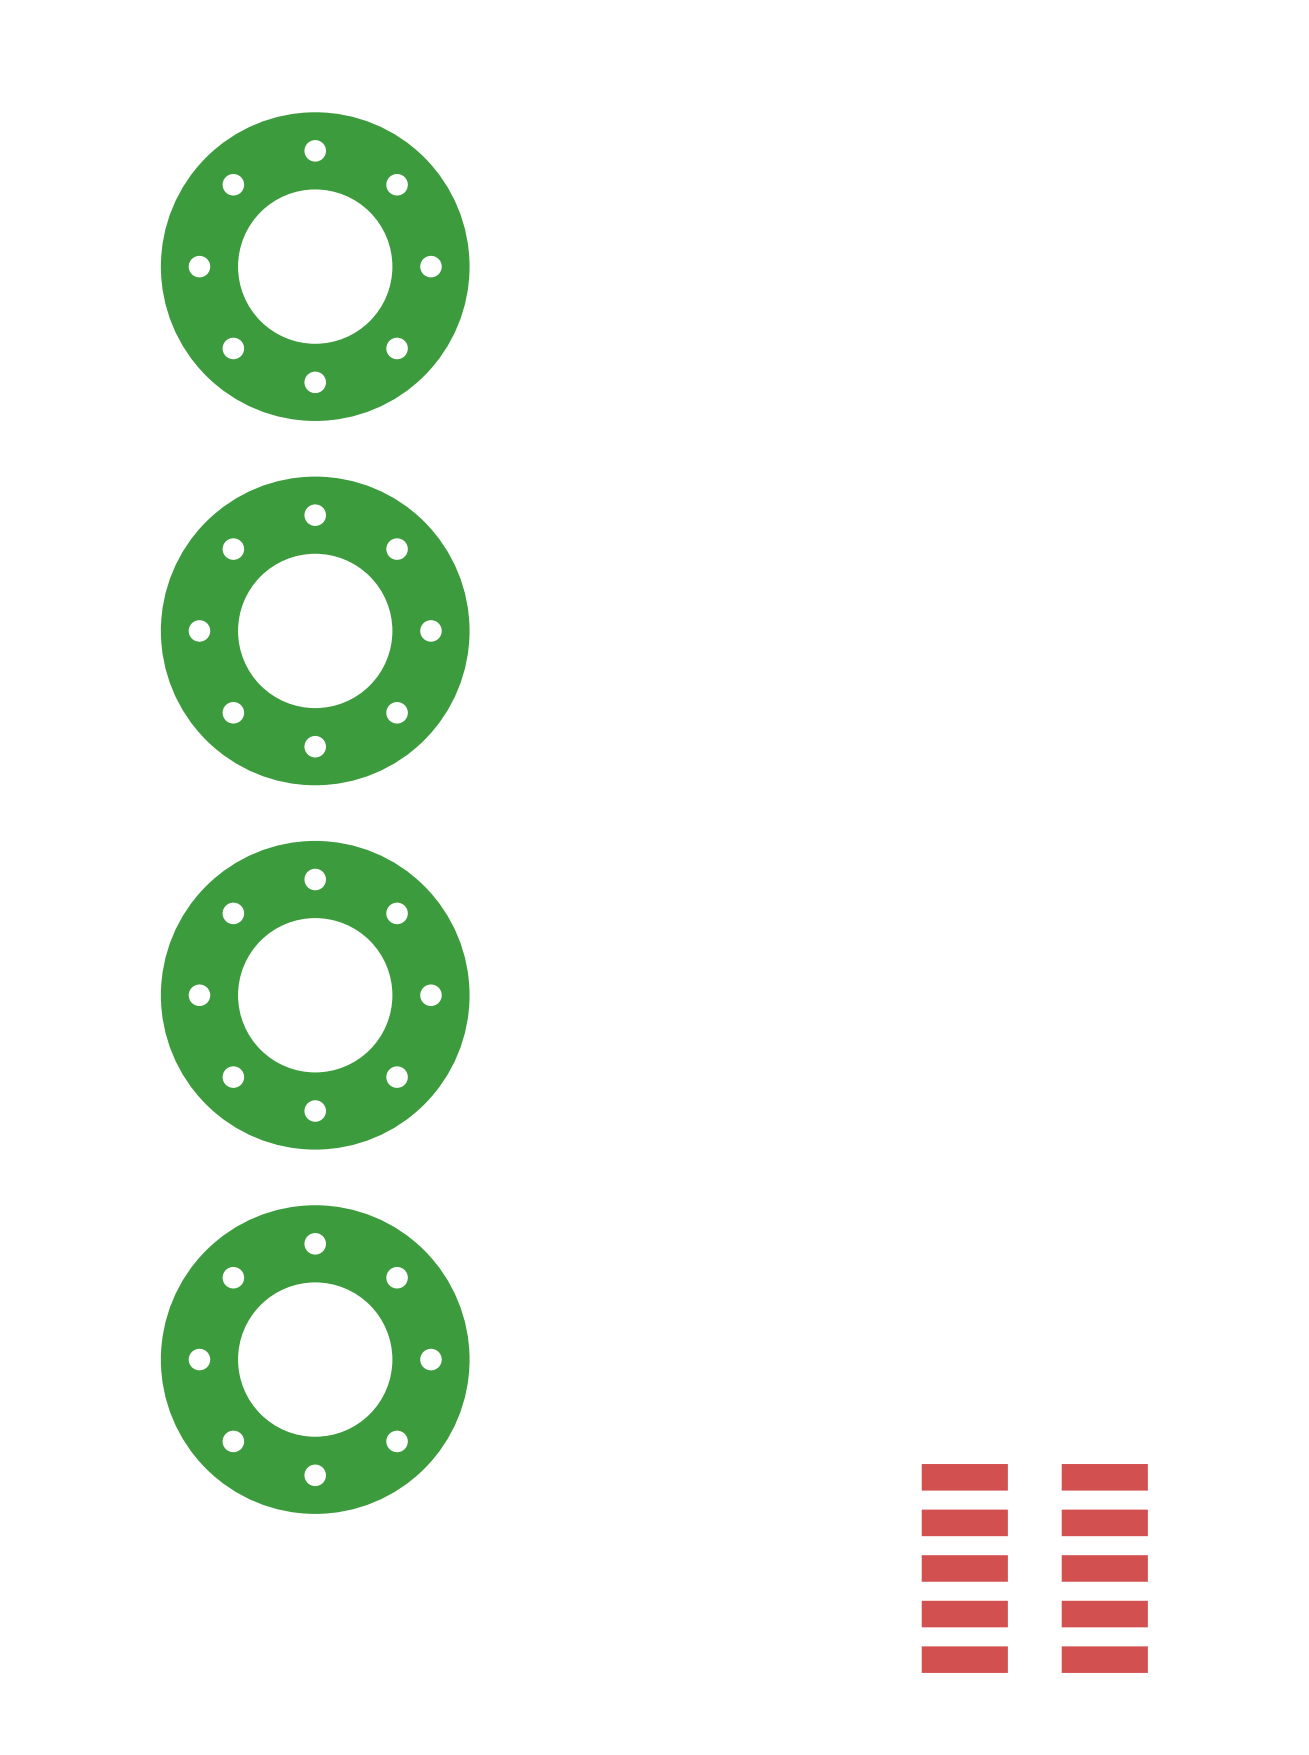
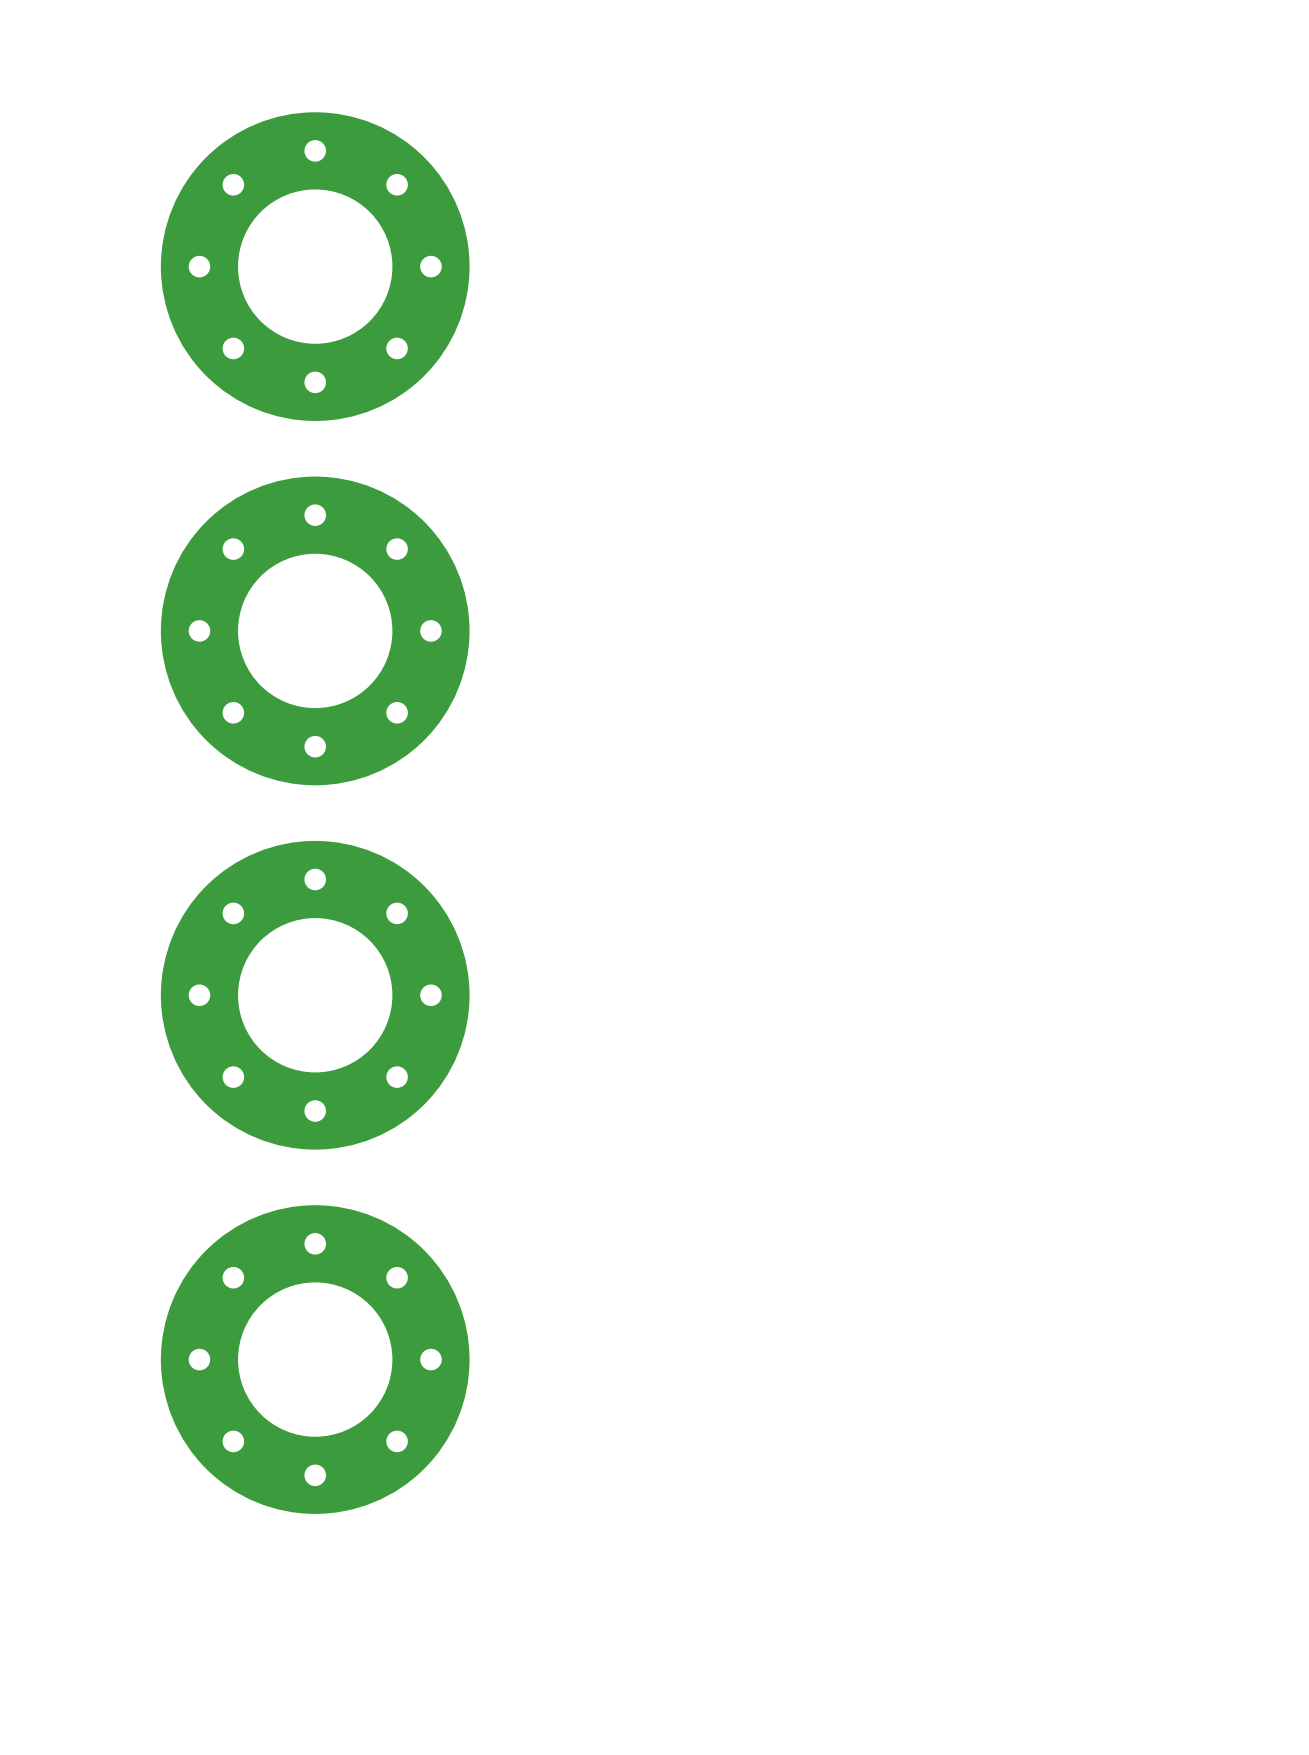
part: (1034, 1568) -> none

